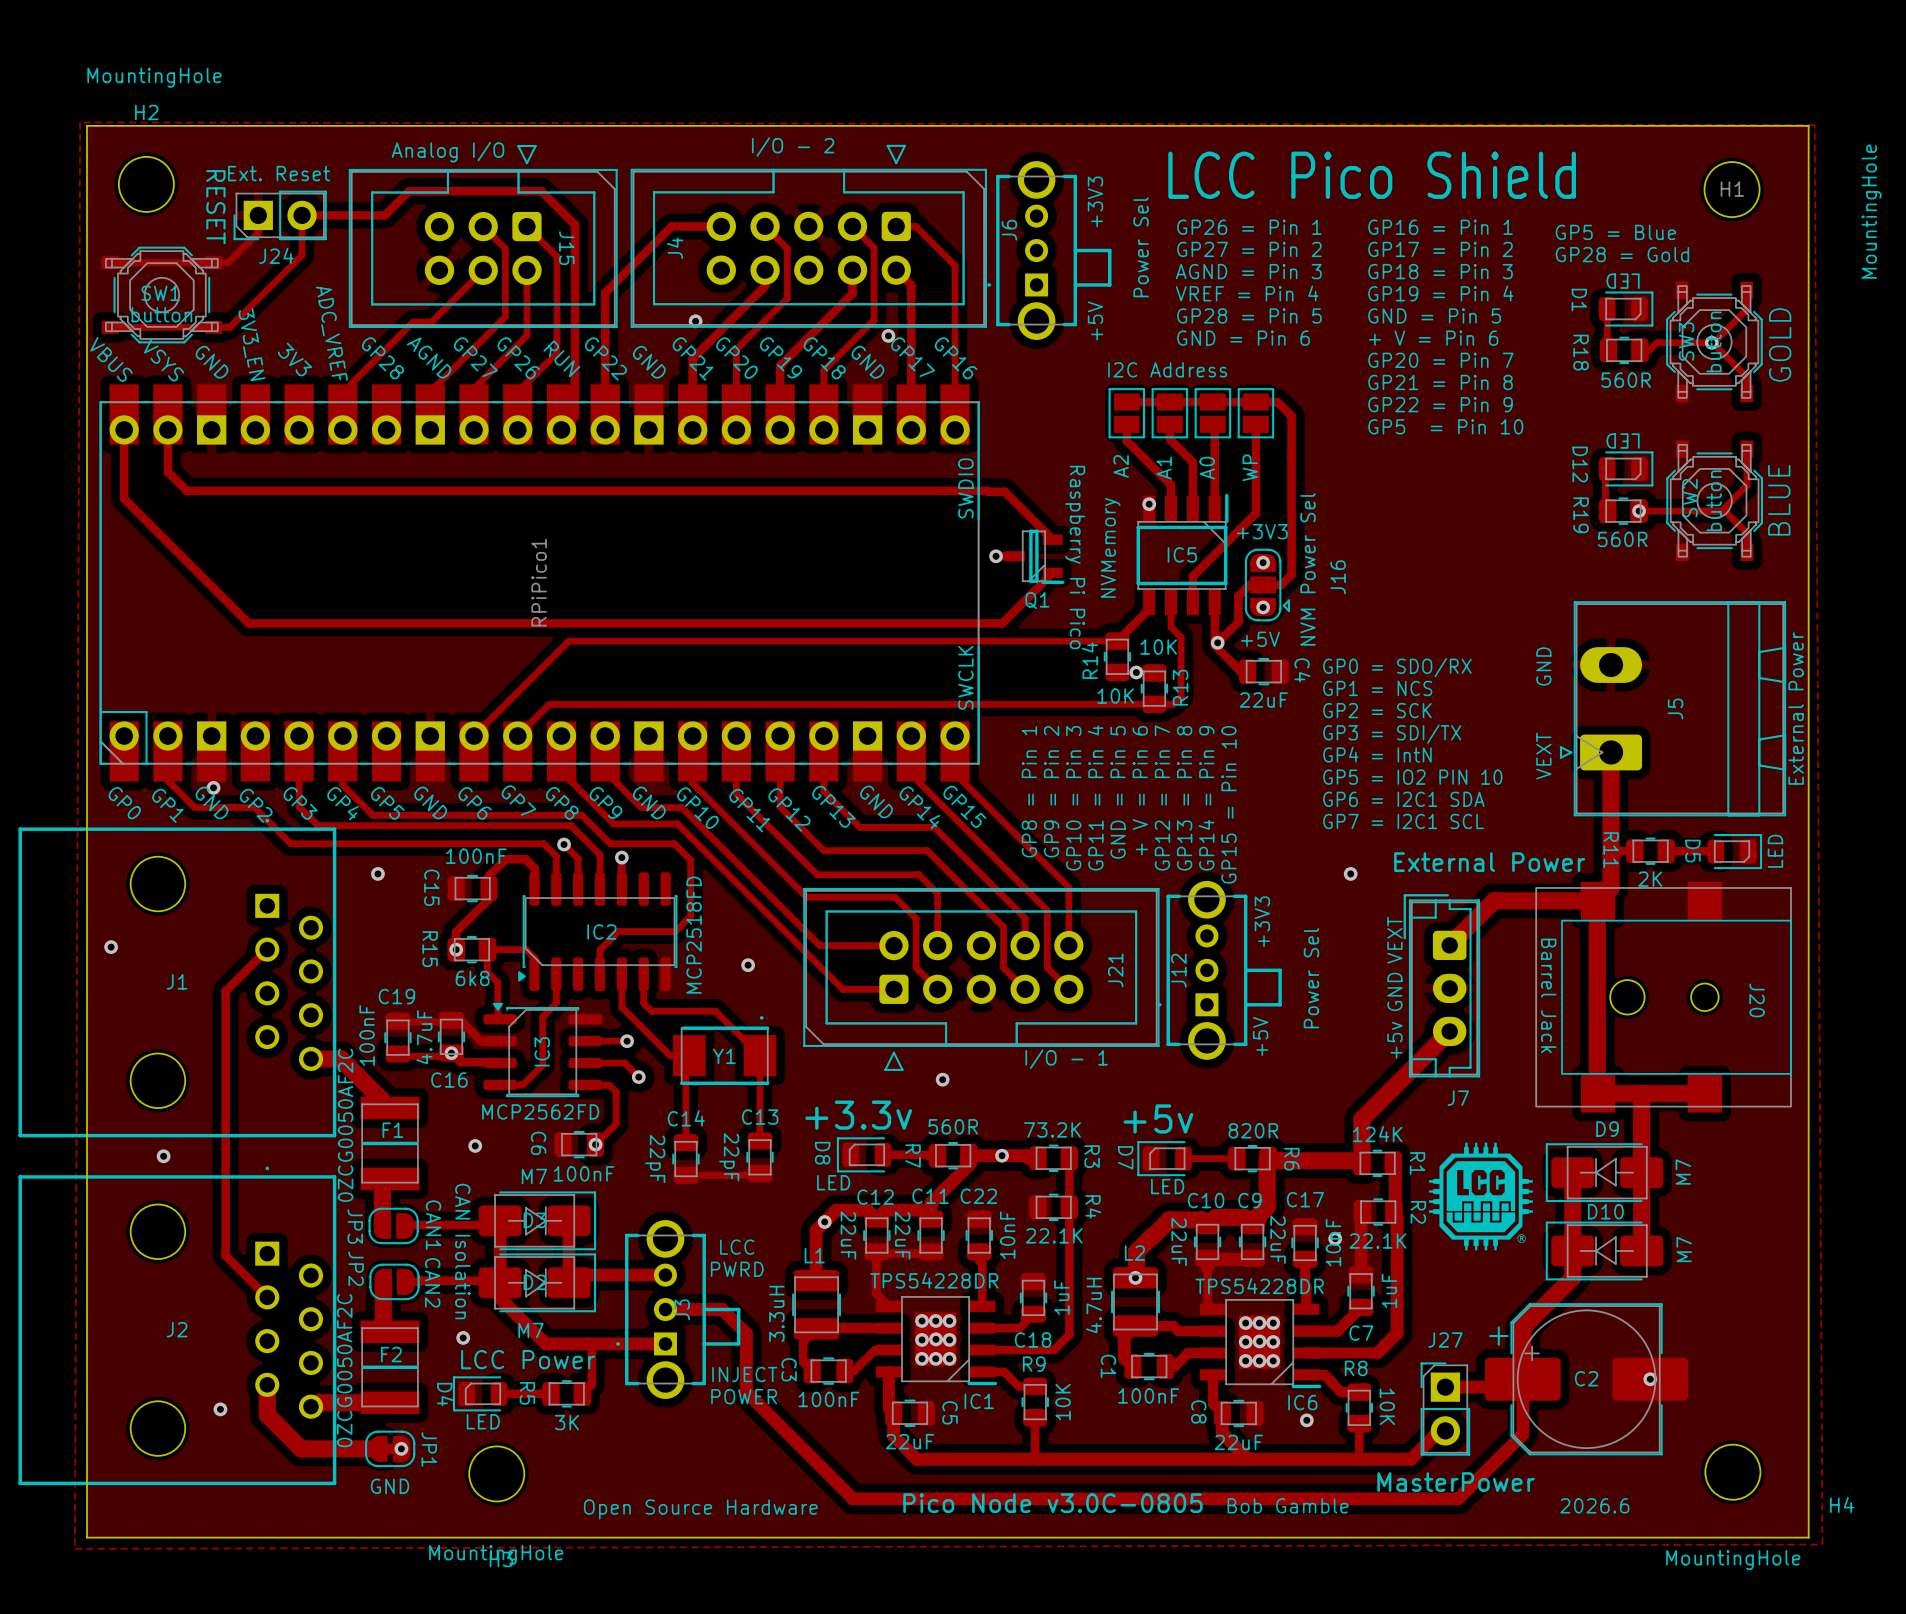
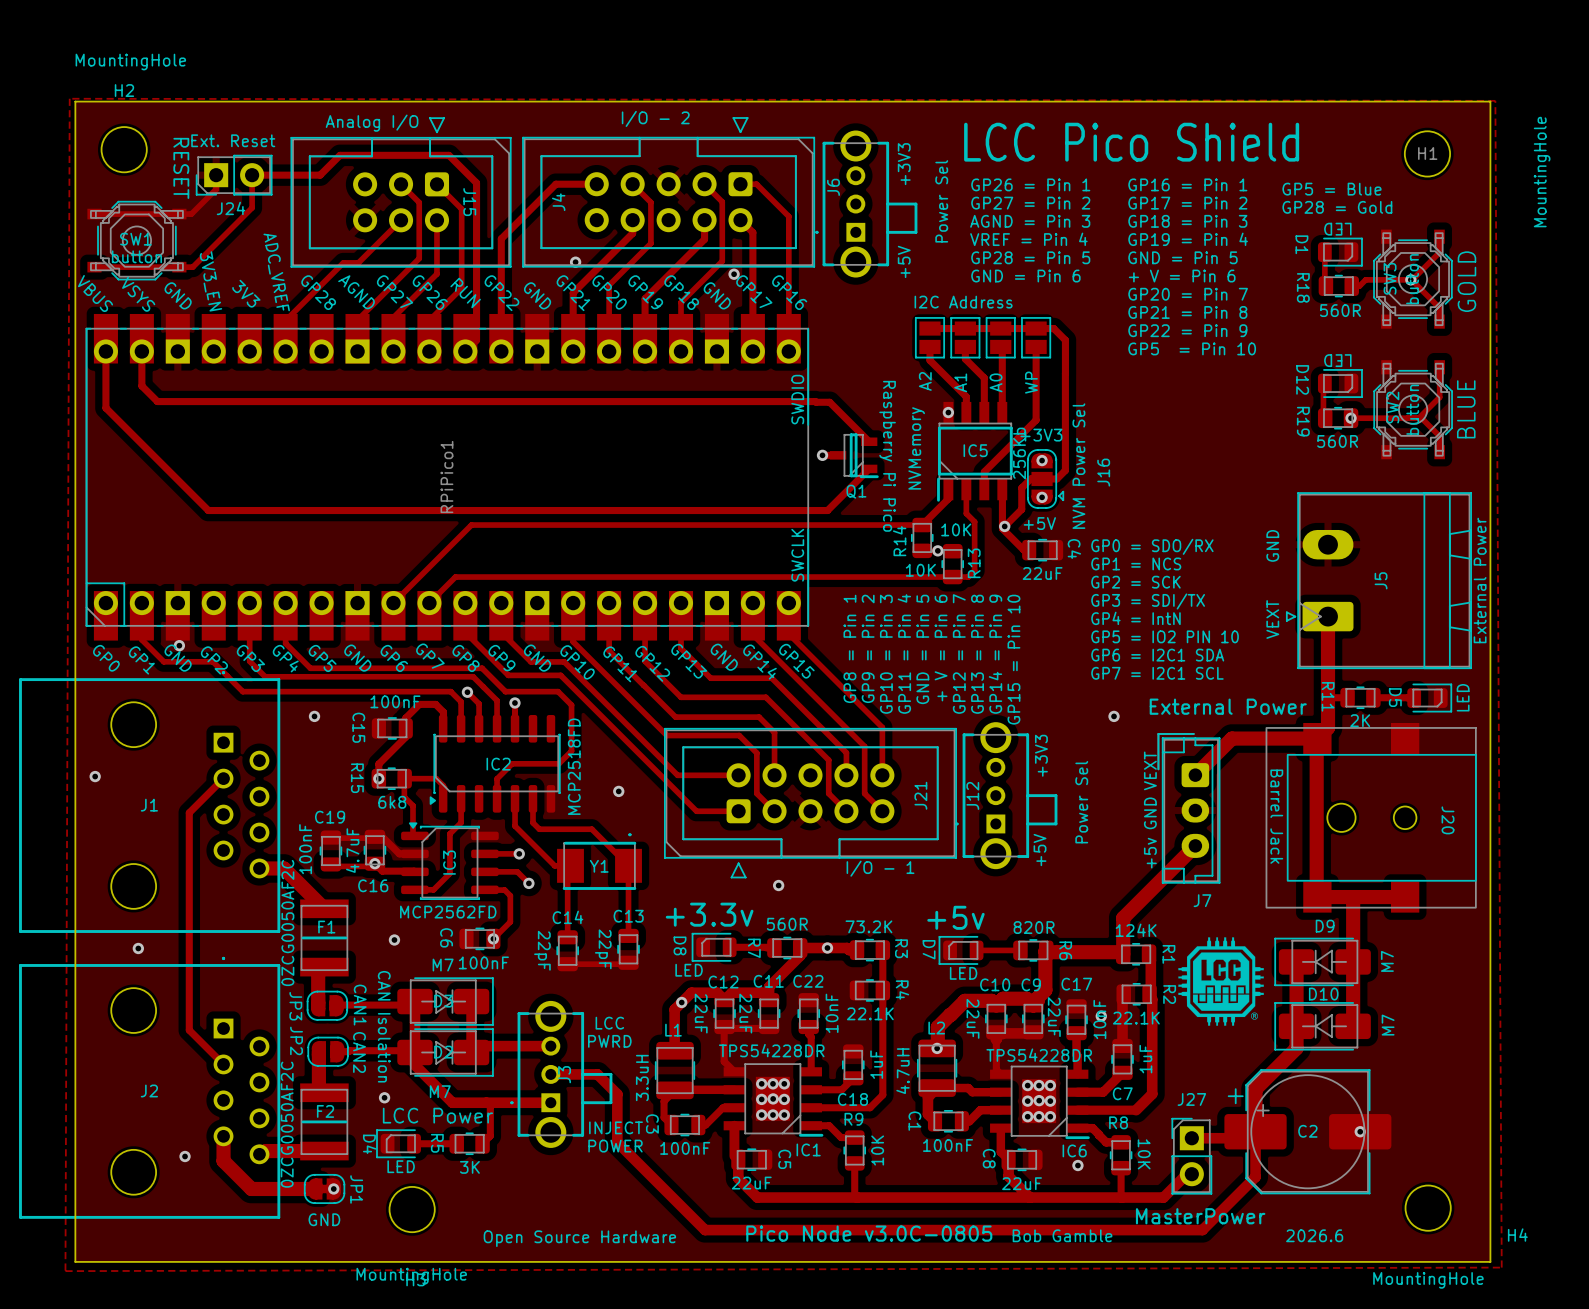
IC5 rotation: 0° (1182, 554) -> 180° (974, 451)
IC5 value: none -> 256Kb (1019, 453)

